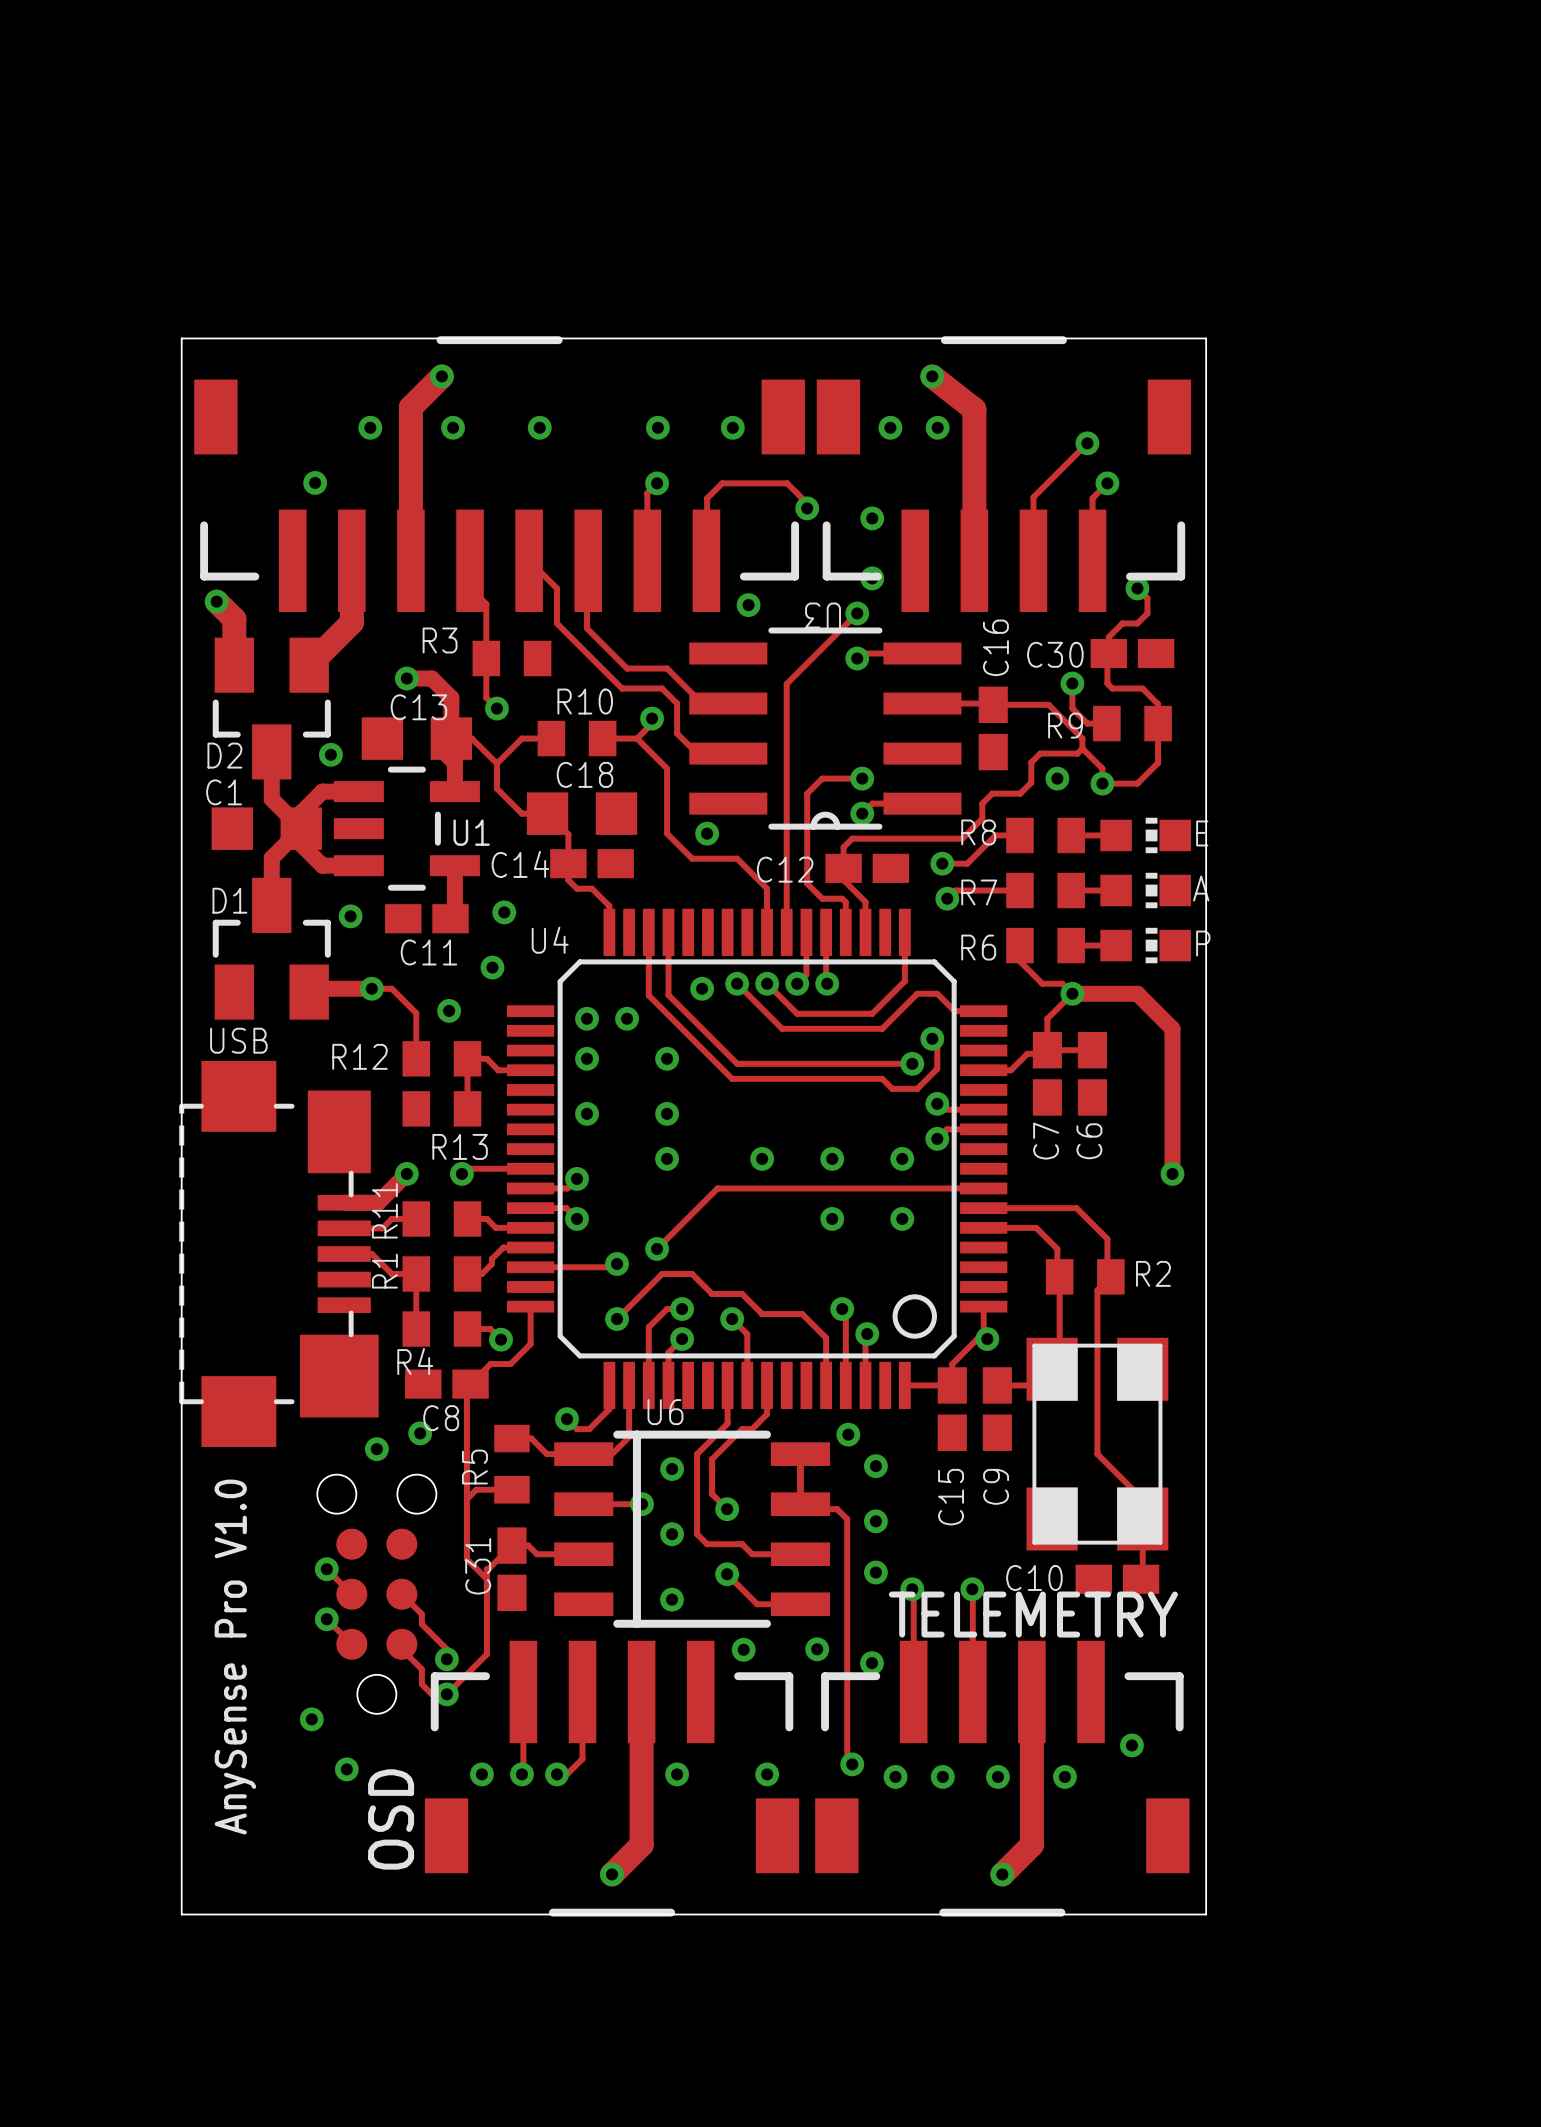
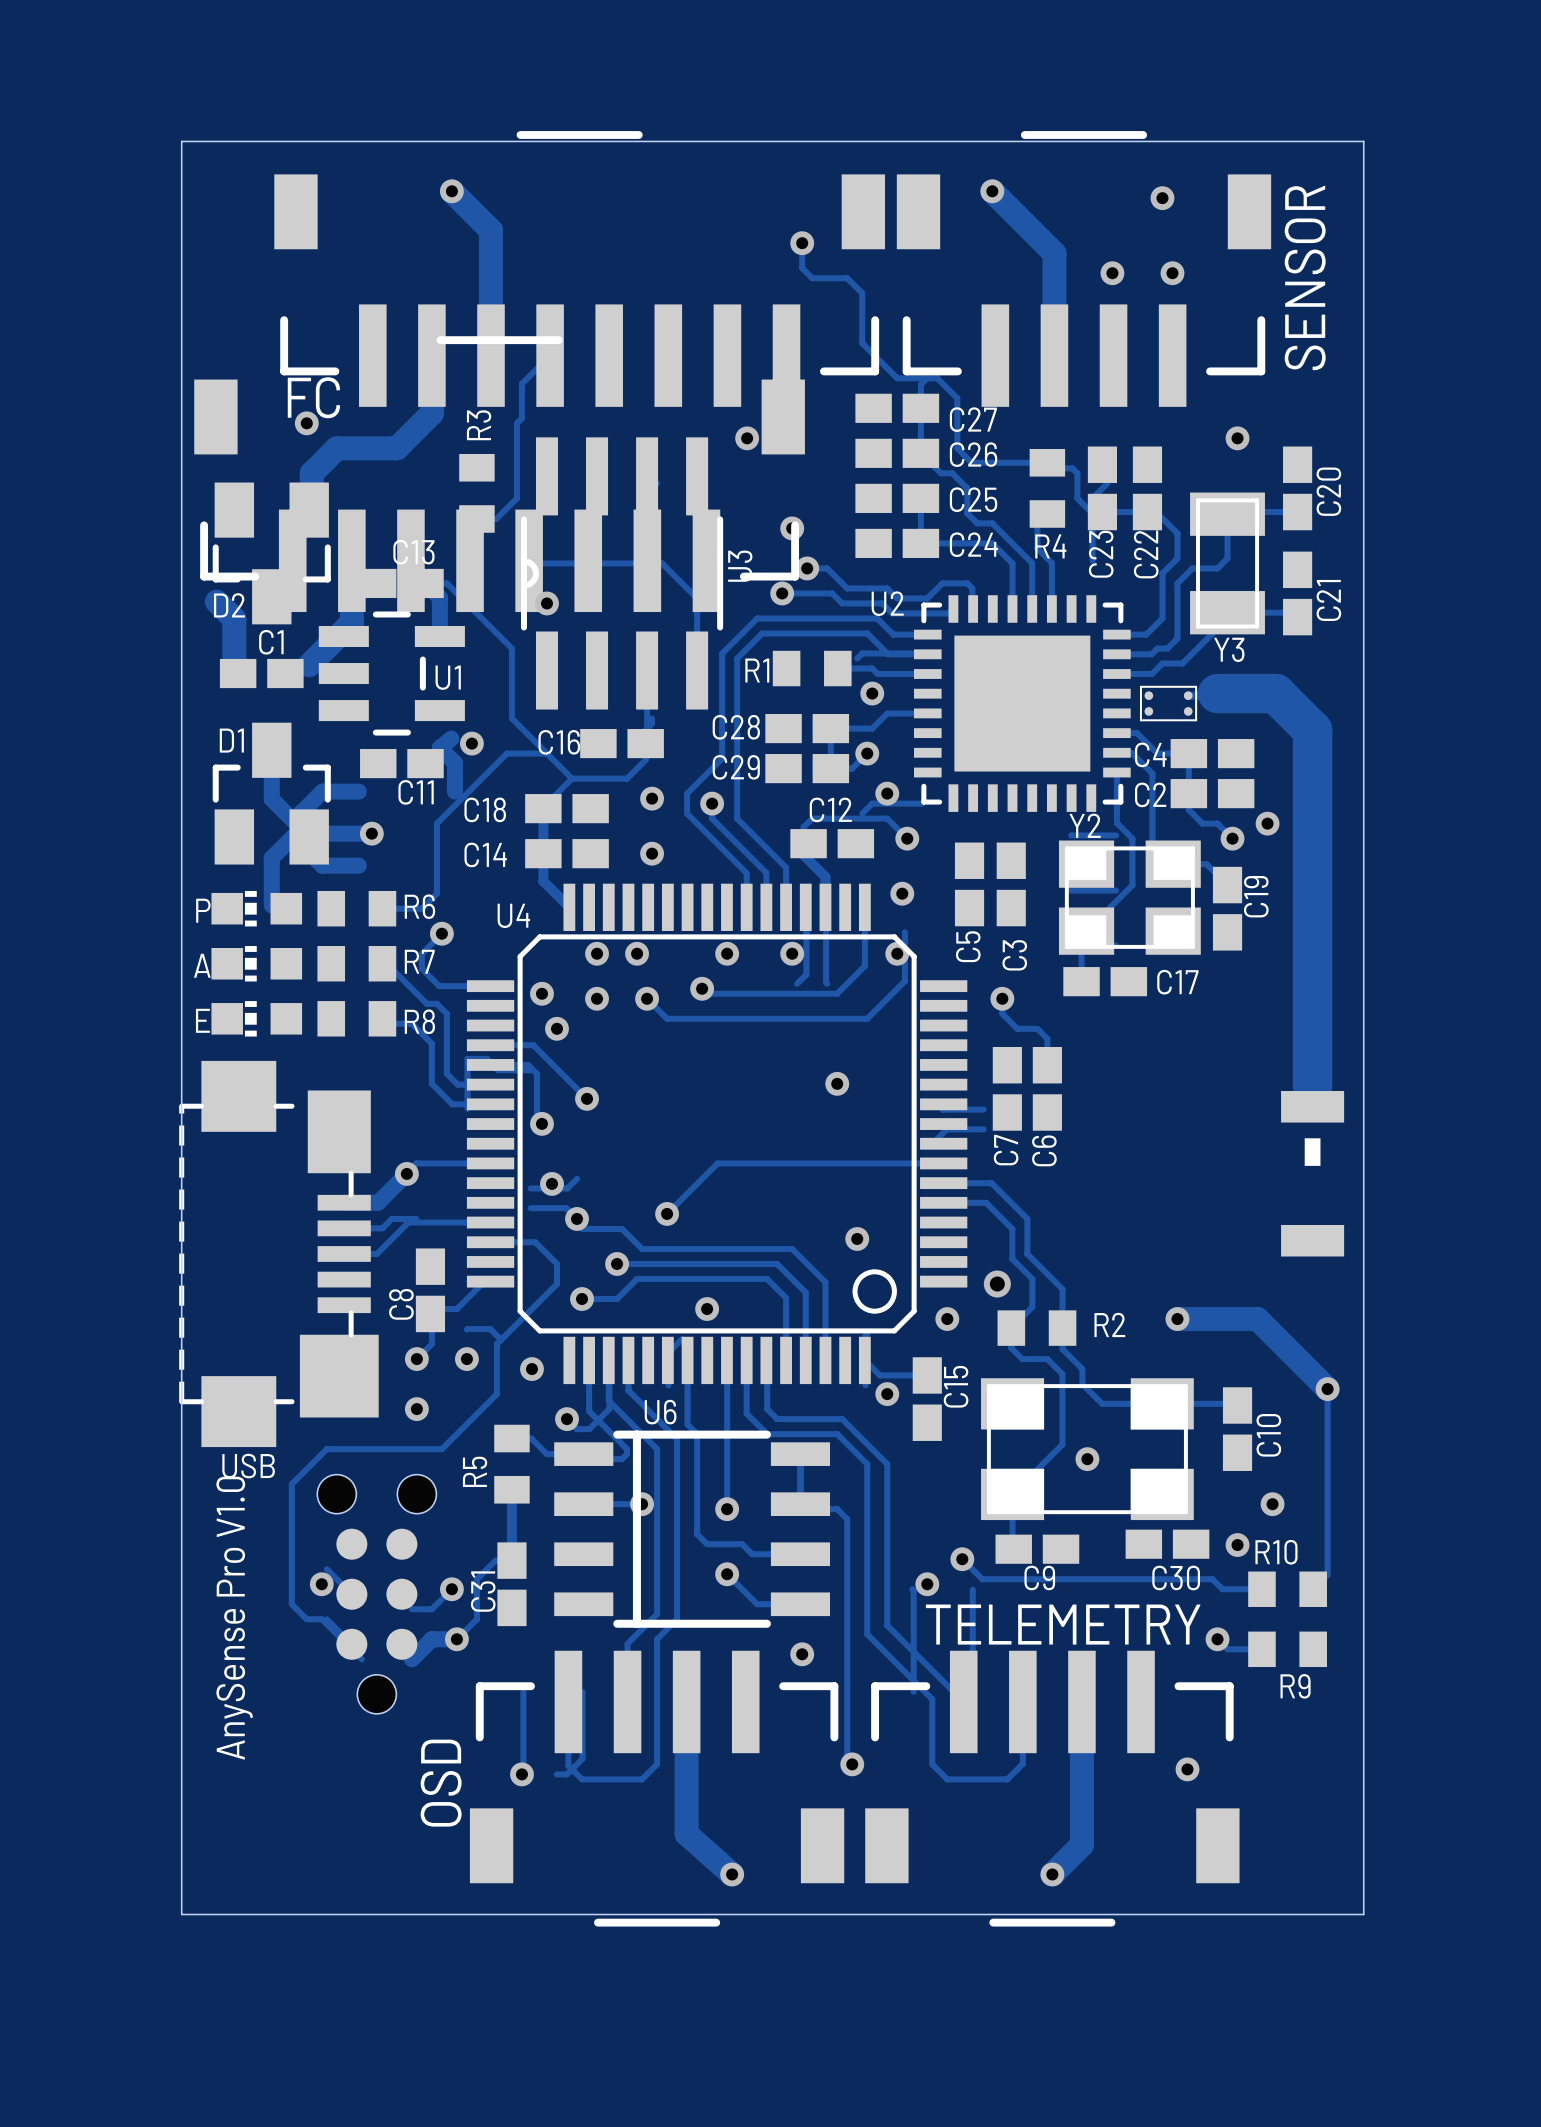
track: none -> (451, 191) (491, 230) (491, 355)
via: none -> (451, 191)
track: none -> (992, 191) (1054, 253) (1054, 355)
via: none -> (992, 191)
via: none -> (1162, 198)
track: none -> (802, 243) (802, 268) (812, 278) (847, 278) (862, 293) (862, 343) (897, 378) (937, 378) (957, 398) (957, 448) (971, 462) (1047, 462) (1052, 468) (1072, 468) (1077, 473) (1077, 498) (1091, 512) (1156, 512) (1177, 533) (1177, 558) (1162, 573) (1162, 618) (1146, 634) (1116, 634) (1118, 633)
via: none -> (802, 243)
FC: none -> (579, 268)
SENSOR: none -> (1083, 268)
via: none -> (1112, 273)
via: none -> (1172, 273)
board edge: (181, 338) (1206, 338) (1206, 1914) -> (181, 338) (181, 141) (1363, 141) (1363, 1914) (1206, 1914)
track: none -> (431, 355) (431, 413) (396, 448) (336, 448) (311, 473) (311, 507) (309, 510)
track: none -> (550, 355) (521, 383) (521, 418) (516, 423) (516, 498) (496, 519) (476, 519) (476, 563)
track: (441, 376) (410, 407) (410, 560) -> none
via: (441, 376) -> none
track: (932, 376) (974, 409) (974, 560) -> none
via: (932, 376) -> none
track: none -> (927, 378) (920, 384) (920, 441) (932, 453) (920, 453) (940, 473) (952, 473) (967, 488) (967, 513) (977, 523) (992, 523) (1032, 563) (1032, 608)
C27: none -> (897, 408)
via: none -> (306, 423)
via: (370, 427) -> none
via: (453, 427) -> none
via: (539, 427) -> none
via: (657, 427) -> none
via position: (732, 427) -> (747, 438)
via: (890, 427) -> none
via: (937, 427) -> none
via: none -> (1237, 438)
track: (1087, 443) (1033, 497) (1033, 560) -> none
via: (1087, 443) -> none
C26: none -> (897, 453)
part: (1003, 474) -> none
via: (315, 482) -> none
via: (657, 483) -> none
via: (1107, 483) -> none
C23: none -> (1102, 488)
C22: none -> (1147, 488)
C20: none -> (1297, 488)
C25: none -> (897, 498)
track: none -> (920, 498) (920, 543) (992, 543) (1012, 563) (1012, 608)
track: (807, 508) (807, 503) (787, 483) (722, 483) (707, 498) (706, 560) -> none
via position: (807, 508) -> (792, 528)
track: none -> (1297, 512) (1229, 512) (1227, 514) (1227, 558) (1217, 568) (1192, 568) (1177, 583) (1177, 638) (1167, 648) (1157, 648) (1151, 654) (1116, 654)
track: none -> (1047, 513) (1037, 524) (1037, 548) (1051, 562) (1051, 608)
via: (872, 518) -> none
C24: none -> (897, 543)
track: (470, 560) (471, 562) (471, 589) (486, 604) (486, 697) (496, 708) -> none
track: (529, 560) (557, 588) (557, 623) (622, 688) (662, 688) (677, 703) (677, 733) (697, 753) (728, 753) -> none
track: (588, 560) (587, 628) (627, 668) (667, 668) (702, 703) (728, 703) -> none
track: none -> (526, 563) (662, 563) (697, 598) (697, 670)
Y3: none -> (1227, 563)
track: none -> (807, 568) (827, 568) (847, 588) (887, 588) (897, 598) (927, 598) (942, 583) (967, 583) (972, 588) (973, 608)
via: none -> (807, 568)
via: (872, 578) -> none
track: (1137, 588) (1147, 598) (1147, 613) (1137, 623) (1122, 623) (1108, 637) (1107, 683) (1112, 688) (1142, 688) (1158, 704) (1158, 763) (1137, 783) (1102, 783) (1102, 768) (1082, 748) -> none
via: (1137, 588) -> none
track: none -> (782, 593) (832, 593) (842, 603) (882, 603) (892, 613) (948, 613) (953, 608)
via: none -> (782, 593)
C21: none -> (1297, 593)
via: (216, 601) -> none
via: none -> (546, 603)
via: (748, 605) -> none
track: (857, 613) (786, 684) (786, 932) -> none
via: (857, 613) -> none
track: none -> (1297, 617) (1293, 612) (1227, 612) (1227, 618) (1182, 663) (1162, 663) (1151, 674) (1116, 674)
track: none -> (927, 634) (893, 634) (877, 618) (757, 618) (722, 653) (722, 758) (687, 793) (687, 813) (746, 873) (746, 907)
track: none -> (439, 636) (439, 597) (425, 583) (446, 583) (511, 648) (511, 718) (572, 778)
C16 name position: C16 (995, 647) -> C16 (559, 742)
C30 position: (1132, 653) -> (1167, 1544)
track: none -> (927, 654) (888, 654) (867, 633) (762, 633) (737, 658) (737, 818) (786, 867) (786, 907)
C30 name position: C30 (1055, 654) -> C30 (1176, 1577)
R3 rotation: 0° (511, 658) -> 90° clockwise (476, 493)
R3 position: (511, 658) -> (476, 493)
via position: (857, 658) -> (872, 693)
track: none -> (837, 668) (872, 668) (877, 674) (927, 674)
track: none -> (647, 670) (645, 759) (627, 778) (572, 778)
track: (406, 678) (431, 678) (451, 697) (451, 738) (471, 738) (496, 763) (496, 788) (521, 813) (547, 813) (568, 834) (568, 880) (577, 888) (592, 888) (609, 906) (609, 932) -> none
via: (406, 678) -> none
track: (1072, 683) (1072, 708) (1087, 723) (1106, 723) -> none
via: (1072, 683) -> none
track: none -> (1188, 695) (1275, 693) (1312, 730) (1312, 1106)
R10 name position: R10 (585, 701) -> R10 (1276, 1552)
track: (922, 703) (1048, 704) (1082, 738) (1082, 748) -> none
U2: none -> (1022, 703)
part: none -> (1168, 703)
D2 position: (271, 708) -> (271, 553)
via position: (496, 708) -> (471, 743)
track: none -> (927, 713) (887, 713) (872, 728) (830, 728) (830, 768) (852, 768) (867, 753)
C13 footprint: [361, 717, 473, 760] -> [360, 568, 444, 599]
via: (652, 718) -> none
R9 position: (1132, 723) -> (1287, 1649)
R9 name position: R9 (1065, 725) -> R9 (1295, 1686)
C28: none -> (807, 728)
U3 rotation: 0° (825, 728) -> 90° clockwise (622, 573)
U3 position: (825, 728) -> (622, 573)
C16 rotation: 0° (993, 728) -> 90° clockwise (622, 743)
C16 position: (993, 728) -> (622, 743)
track: none -> (1116, 733) (1136, 733) (1157, 753) (1188, 753) (1188, 810) (1202, 823) (1217, 823) (1232, 838)
track: (551, 738) (521, 738) (506, 753) -> (546, 753) (506, 753)
R10 position: (577, 738) -> (1287, 1589)
track: (602, 738) (637, 738) (667, 768) (667, 833) (692, 858) (737, 858) (767, 888) (767, 932) -> none
track: (1082, 748) (1077, 753) (1040, 753) (1031, 762) (1031, 782) (1020, 793) (992, 793) (982, 803) (982, 818) (962, 838) (852, 838) (843, 847) (843, 880) (865, 901) (865, 932) -> none
track: none -> (1116, 752) (1131, 752) (1152, 773) (1152, 843) (1173, 864) (1206, 864) (1227, 885)
via: none -> (867, 753)
C4: none -> (1212, 753)
via: (330, 754) -> none
D2 name position: D2 (224, 755) -> D2 (229, 605)
track: none -> (496, 763) (436, 823) (436, 893) (421, 908) (382, 908)
C29: none -> (807, 768)
track: none -> (1116, 772) (1116, 823) (1132, 838) (1132, 885) (1081, 936) (1081, 981)
C18 name position: C18 (584, 774) -> C18 (485, 809)
track: none -> (572, 778) (543, 808)
track: (862, 778) (822, 778) (807, 793) (807, 883) (822, 898) (842, 898) (845, 902) (845, 932) -> none
via: (862, 778) -> none
via: (1057, 778) -> none
via: (1102, 783) -> none
C18 footprint: [526, 792, 638, 835] -> [525, 794, 609, 824]
via: none -> (887, 793)
C2: none -> (1212, 793)
via: none -> (652, 798)
track: none -> (712, 803) (712, 818) (766, 872) (766, 907)
via: none -> (712, 803)
C1 footprint: [211, 807, 322, 850] -> [219, 658, 304, 689]
track: none -> (543, 808) (543, 881) (569, 907)
via: (862, 813) -> none
via: none -> (1267, 823)
U1 position: (406, 828) -> (391, 673)
R8 name position: R8 (978, 832) -> R8 (419, 1021)
track: none -> (371, 833) (312, 833) (309, 836)
via: none -> (371, 833)
via: (707, 833) -> none
track: (1019, 835) (995, 835) (967, 863) (942, 863) -> none
R8 position: (1045, 835) -> (356, 1018)
E rotation: 0° (1145, 835) -> 180° (256, 1018)
E position: (1145, 835) -> (256, 1018)
track: none -> (907, 838) (887, 818) (812, 818) (803, 827) (808, 843) (803, 855) (825, 876) (825, 907)
via: none -> (907, 838)
via: none -> (1232, 838)
via: none -> (652, 853)
C14 position: (592, 863) -> (567, 853)
via: (942, 863) -> none
track: (454, 865) (454, 914) (450, 918) -> none
C12 position: (867, 868) -> (832, 843)
C12 name position: C12 (785, 869) -> C12 (830, 809)
C5: none -> (969, 884)
C3: none -> (1011, 884)
track: (1019, 890) (955, 890) (947, 898) -> none
R7 position: (1045, 890) -> (356, 963)
A rotation: 0° (1145, 890) -> 180° (256, 963)
A position: (1145, 890) -> (256, 963)
R7 name position: R7 (979, 892) -> R7 (419, 961)
via: none -> (902, 893)
Y2: none -> (1129, 897)
via: (947, 898) -> none
D1 name position: D1 (229, 900) -> D1 (231, 740)
track: none -> (864, 907) (864, 966) (837, 993) (707, 993) (697, 983)
C19: none -> (1227, 908)
via: (504, 912) -> none
via: (350, 916) -> none
C11 position: (426, 918) -> (401, 763)
track: (648, 932) (648, 995) (732, 1078) (882, 1078) (892, 1088) (917, 1088) (937, 1068) (937, 1043) (932, 1038) -> none
track: (668, 932) (668, 995) (737, 1063) (912, 1063) -> none
track: none -> (441, 933) (421, 953) (421, 968) (439, 986) (490, 986)
via: none -> (441, 933)
track: (1019, 945) (1019, 961) (1042, 983) (1062, 983) (1072, 993) -> none
R6 position: (1045, 945) -> (356, 908)
P rotation: 0° (1145, 945) -> 180° (256, 908)
P position: (1145, 945) -> (256, 908)
R6 name position: R6 (978, 947) -> R6 (419, 906)
D1 position: (271, 948) -> (271, 793)
C11 name position: C11 (428, 952) -> C11 (416, 792)
via: none -> (597, 953)
via: none -> (637, 953)
via: none -> (727, 953)
via: none -> (792, 953)
via: none -> (897, 953)
track: none -> (382, 963) (386, 963) (426, 1003) (436, 1003) (446, 1013) (446, 1073) (457, 1084) (490, 1084)
via: (492, 967) -> none
C17: none -> (1105, 981)
track: (737, 983) (782, 1028) (882, 1028) (917, 993) (937, 993) (954, 1011) (983, 1011) -> none
via: (737, 983) -> none
track: (767, 983) (797, 1013) (872, 1013) -> (647, 998) (667, 1018) (867, 1018) (872, 1013)
via: (767, 983) -> none
via: (797, 983) -> none
via: (827, 983) -> none
via: (371, 988) -> none
track: (309, 992) (312, 988) (391, 988) (416, 1013) (416, 1058) -> none
via: none -> (541, 993)
track: (1072, 993) (1047, 1018) (1047, 1038) -> (1002, 998) (1002, 1013) (1017, 1028) (1037, 1028) (1047, 1038)
track: (1072, 993) (1137, 993) (1172, 1028) (1172, 1173) -> none
via: (1072, 993) -> none
via: none -> (1002, 998)
via: (449, 1010) -> none
track: none -> (382, 1018) (387, 1023) (411, 1023) (431, 1043) (431, 1083) (452, 1104) (490, 1104)
via position: (587, 1018) -> (597, 998)
via position: (627, 1018) -> (647, 998)
via: none -> (557, 1028)
via: (932, 1038) -> none
USB name position: USB (238, 1040) -> USB (248, 1466)
track: none -> (490, 1045) (533, 1045) (587, 1098)
track: (1092, 1050) (1047, 1050) (1043, 1053) (1027, 1053) (1010, 1070) (983, 1070) -> none
R12: (441, 1058) -> none
via: (587, 1058) -> none
via: (667, 1058) -> none
via: (912, 1063) -> none
track: none -> (490, 1064) (528, 1064) (536, 1073) (536, 1118) (541, 1123)
C7 position: (1047, 1073) -> (1007, 1088)
C6 position: (1092, 1073) -> (1047, 1088)
via: none -> (837, 1083)
via: (937, 1103) -> none
R13: (441, 1108) -> none
via position: (587, 1113) -> (587, 1098)
via: (667, 1113) -> none
via: none -> (541, 1123)
via: (937, 1138) -> none
via: (667, 1158) -> none
U4 position: (757, 1158) -> (717, 1133)
via: (762, 1158) -> none
via: (832, 1158) -> none
via: (902, 1158) -> none
track: none -> (490, 1163) (416, 1163) (406, 1173)
track: none -> (943, 1163) (717, 1163) (667, 1213)
track: (530, 1168) (467, 1168) (461, 1173) -> none
via: (461, 1173) -> none
via: (1172, 1173) -> none
part: none -> (1312, 1173)
via position: (577, 1178) -> (552, 1183)
track: none -> (943, 1183) (991, 1183) (1027, 1218) (1027, 1253) (1062, 1289) (1062, 1349) (1082, 1369) (1082, 1384) (1102, 1403) (1230, 1403) (1237, 1405)
track: (983, 1188) (717, 1188) (657, 1248) -> none
track: none -> (943, 1202) (986, 1202) (1012, 1228) (1012, 1258) (1032, 1279) (1032, 1307) (1011, 1328)
track: (983, 1208) (1076, 1208) (1107, 1238) (1107, 1273) (1110, 1276) (1097, 1290) (1097, 1454) (1142, 1499) (1142, 1577) (1141, 1579) -> none
via: none -> (667, 1213)
R11: (441, 1218) -> none
track: (467, 1218) (486, 1218) (495, 1227) (530, 1227) -> none
via: (832, 1218) -> none
via: (902, 1218) -> none
track: (983, 1227) (1036, 1227) (1057, 1248) (1057, 1274) (1059, 1276) (1059, 1361) (1035, 1385) (997, 1385) -> none
track: none -> (582, 1228) (622, 1228) (642, 1248) (792, 1248) (825, 1282) (825, 1360)
via: none -> (857, 1238)
track: none -> (490, 1242) (535, 1242) (557, 1263) (557, 1284) (496, 1344) (496, 1394) (441, 1449) (326, 1449) (291, 1484) (291, 1604) (306, 1619) (321, 1619) (361, 1659)
track: (530, 1247) (503, 1247) (491, 1258) (491, 1263) (481, 1274) (467, 1274) -> none
via: (657, 1248) -> none
track: (371, 1253) (391, 1274) (416, 1274) (416, 1329) -> (371, 1253) (376, 1253) (408, 1222) (490, 1222) (489, 1223)
track: none -> (612, 1263) (777, 1263) (805, 1292) (805, 1360)
track: (617, 1263) (613, 1267) (530, 1267) -> none
R1 name rotation: 0° (384, 1271) -> 90° clockwise (757, 670)
R1 position: (441, 1274) -> (812, 668)
R2 position: (1085, 1276) -> (1036, 1328)
track: none -> (484, 1281) (456, 1309) (435, 1309) (430, 1313) (431, 1343) (416, 1359)
via: none -> (997, 1284)
track: none -> (582, 1299) (617, 1299) (637, 1279) (767, 1279) (786, 1297) (786, 1360)
track: (530, 1306) (530, 1344) (510, 1364) (490, 1364) (466, 1387) (466, 1559) (486, 1579) -> none
track: (983, 1306) (983, 1335) (987, 1339) (977, 1339) (952, 1364) (952, 1385) (904, 1385) -> none
track: (682, 1309) (667, 1309) (648, 1327) (648, 1385) -> none
via: (682, 1309) -> none
via: none -> (707, 1309)
track: (842, 1309) (845, 1312) (845, 1385) -> none
via: (842, 1309) -> none
track: (617, 1319) (662, 1274) (692, 1274) (712, 1294) (742, 1294) (762, 1314) (802, 1314) (826, 1337) (826, 1385) -> none
via position: (617, 1319) -> (582, 1299)
track: (732, 1319) (747, 1334) (747, 1385) -> none
via: (732, 1319) -> none
via: none -> (947, 1319)
track: none -> (1177, 1319) (1257, 1319) (1327, 1389) (1327, 1574) (1313, 1589) (1311, 1587)
via: none -> (1177, 1319)
track: none -> (1011, 1328) (1011, 1348) (1022, 1359) (1047, 1359) (1062, 1374) (1062, 1444) (1012, 1494) (1013, 1549)
R4 rotation: 0° (441, 1329) -> 90° clockwise (1047, 488)
R4 position: (441, 1329) -> (1047, 488)
via: (867, 1334) -> none
via: (501, 1339) -> none
via: (682, 1339) -> none
via: (987, 1339) -> none
via: none -> (416, 1359)
via: none -> (466, 1359)
track: none -> (608, 1360) (608, 1400) (657, 1449) (657, 1614) (627, 1643) (627, 1701)
track: none -> (628, 1360) (628, 1390) (677, 1439) (677, 1619) (657, 1639) (657, 1764) (642, 1779) (582, 1779) (568, 1765) (568, 1701)
track: none -> (746, 1360) (746, 1413) (767, 1434) (837, 1434) (867, 1464) (867, 1634) (932, 1699) (932, 1764) (947, 1779) (1007, 1779) (1022, 1763) (1022, 1701)
track: none -> (864, 1360) (879, 1375) (927, 1375)
via: none -> (531, 1369)
C8 rotation: 0° (446, 1384) -> 90° clockwise (430, 1290)
C8 position: (446, 1384) -> (430, 1290)
track: (629, 1385) (629, 1437) (607, 1459) -> (589, 1360) (589, 1411) (627, 1449) (627, 1454) (622, 1459) (607, 1459)
track: (727, 1385) (727, 1423) (697, 1454) -> (687, 1360) (687, 1424) (697, 1434) (697, 1454)
via: none -> (1327, 1389)
via: none -> (887, 1394)
track: (767, 1409) (767, 1414) (752, 1429) (742, 1429) (712, 1459) (712, 1494) (727, 1509) -> (727, 1360) (727, 1509)
track: none -> (767, 1409) (777, 1419) (842, 1419) (887, 1464) (887, 1625) (963, 1701)
C15 position: (952, 1409) -> (927, 1399)
C9 rotation: 0° (997, 1409) -> 90° clockwise (1037, 1549)
C9 position: (997, 1409) -> (1037, 1549)
via position: (420, 1433) -> (416, 1409)
via: (848, 1434) -> none
part rotation: 0° (1097, 1444) -> 90° clockwise (1087, 1449)
via: (376, 1449) -> none
via: none -> (1087, 1459)
via: (875, 1466) -> none
via: (672, 1469) -> none
track: (511, 1489) (476, 1489) (466, 1499) -> none
C15 name position: C15 (951, 1497) -> C15 (956, 1386)
track: none -> (511, 1499) (511, 1560) (495, 1560) (476, 1579) (476, 1619) (456, 1639) (431, 1639) (411, 1659)
via: none -> (1272, 1504)
via: (875, 1521) -> none
via: (672, 1534) -> none
via: none -> (1237, 1545)
track: none -> (962, 1559) (982, 1579) (1212, 1579) (1222, 1589) (1261, 1589)
via: none -> (962, 1559)
track: (582, 1560) (583, 1554) (536, 1554) (528, 1545) (511, 1545) (486, 1569) (486, 1654) (446, 1694) (431, 1694) (421, 1684) (421, 1669) (401, 1649) (401, 1644) -> none
C31 name position: C31 (478, 1566) -> C31 (483, 1591)
via position: (326, 1569) -> (321, 1584)
C31 position: (511, 1569) -> (511, 1584)
via: (875, 1572) -> none
C10 name position: C10 (1034, 1577) -> C10 (1268, 1435)
C10 rotation: 0° (1117, 1579) -> 90° clockwise (1237, 1429)
C10 position: (1117, 1579) -> (1237, 1429)
track: none -> (451, 1589) (431, 1609) (411, 1609)
via: none -> (451, 1589)
via position: (912, 1589) -> (927, 1584)
via: (972, 1589) -> none
track: (401, 1594) (421, 1614) (421, 1624) (446, 1649) (446, 1659) -> none
via: (672, 1599) -> none
TELEMETRY name position: TELEMETRY (1033, 1614) -> TELEMETRY (1063, 1624)
via: (326, 1619) -> none
track: none -> (1217, 1639) (1227, 1649) (1261, 1649)
via: none -> (1217, 1639)
via: (743, 1649) -> none
via position: (817, 1649) -> (802, 1654)
via position: (446, 1659) -> (456, 1639)
via: (871, 1663) -> none
track: (641, 1691) (641, 1844) (612, 1874) -> none
track: (1031, 1691) (1031, 1844) (1002, 1874) -> none
via: (446, 1694) -> none
track: none -> (686, 1701) (686, 1833) (732, 1874)
track: none -> (1081, 1701) (1081, 1844) (1052, 1874)
via: (311, 1719) -> none
via position: (1131, 1745) -> (1187, 1769)
via: (346, 1769) -> none
via: (481, 1774) -> none
via: (557, 1774) -> none
via: (677, 1774) -> none
via: (767, 1774) -> none
via: (895, 1776) -> none
via: (942, 1776) -> none
via: (997, 1776) -> none
via: (1064, 1776) -> none
OSD position: (612, 1778) -> (657, 1788)
TELEMETRY position: (1002, 1778) -> (1052, 1788)
OSD name position: OSD (391, 1819) -> OSD (441, 1783)
via: (612, 1874) -> none
via: none -> (732, 1874)
via: (1002, 1874) -> none
via: none -> (1052, 1874)

